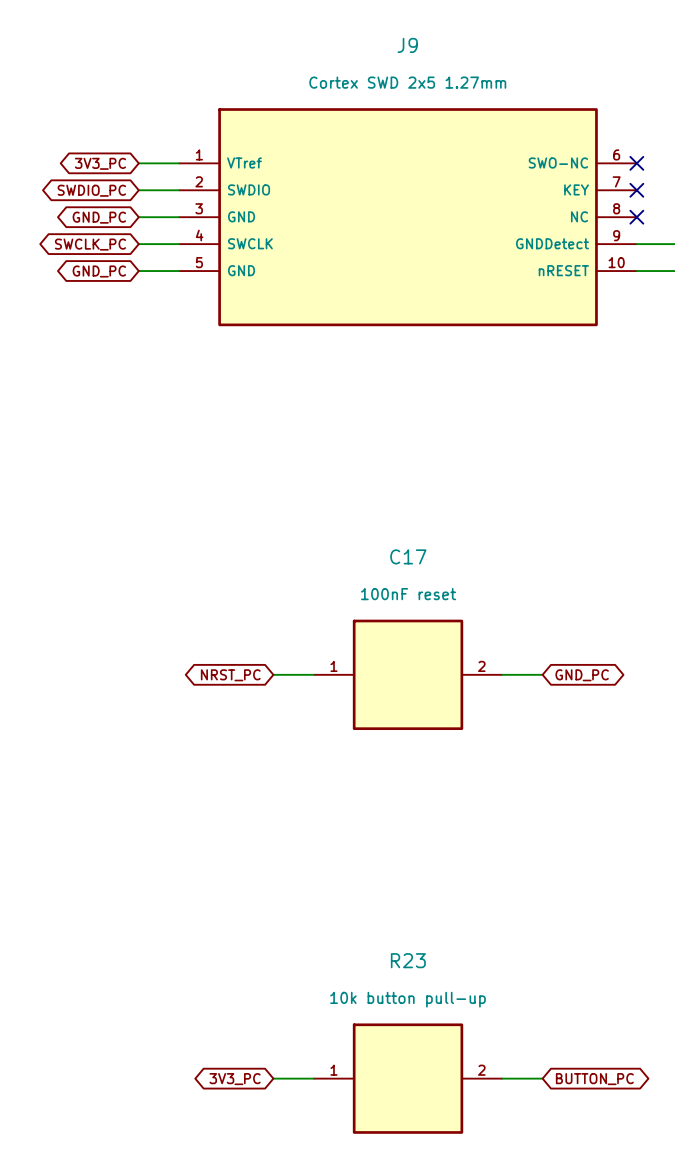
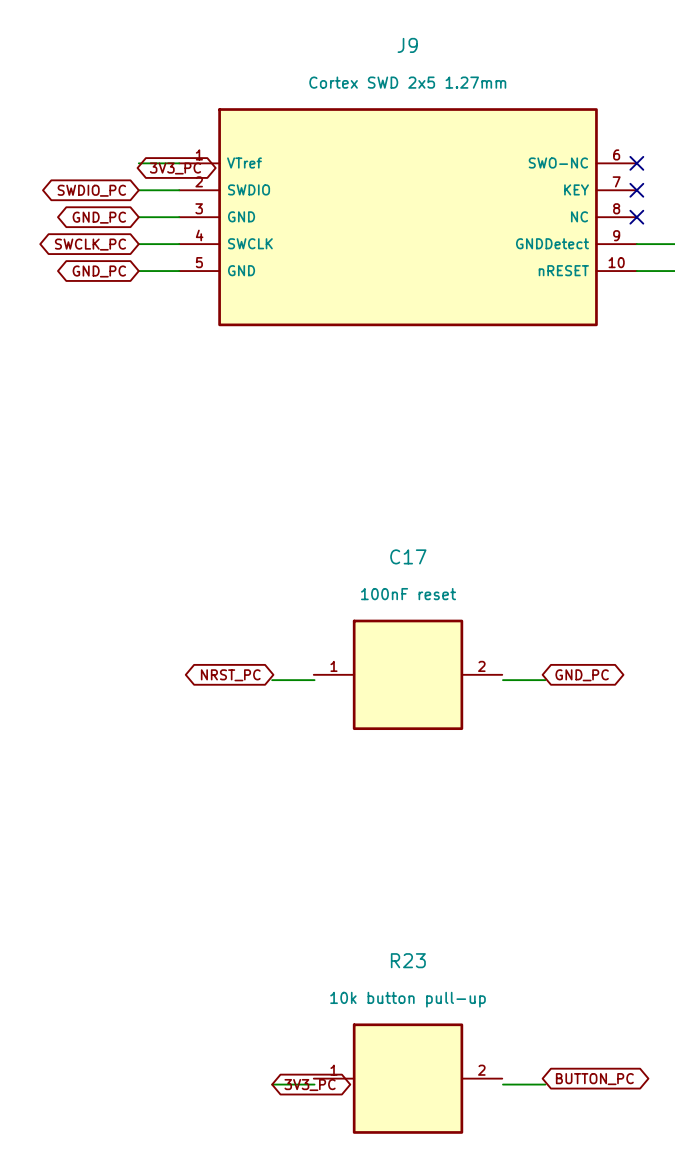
global label rotation: 0° (100, 163) -> 180° (175, 168)
wire: (273, 674) (313, 674) -> none
wire: (502, 674) (542, 674) -> none
wire: none -> (272, 680) (314, 680)
wire: none -> (502, 680) (545, 680)
wire: (273, 1078) (313, 1078) -> none
wire: (502, 1078) (542, 1078) -> none
global label rotation: 0° (235, 1079) -> 180° (310, 1085)
wire: none -> (272, 1084) (314, 1084)
wire: none -> (502, 1084) (545, 1084)

